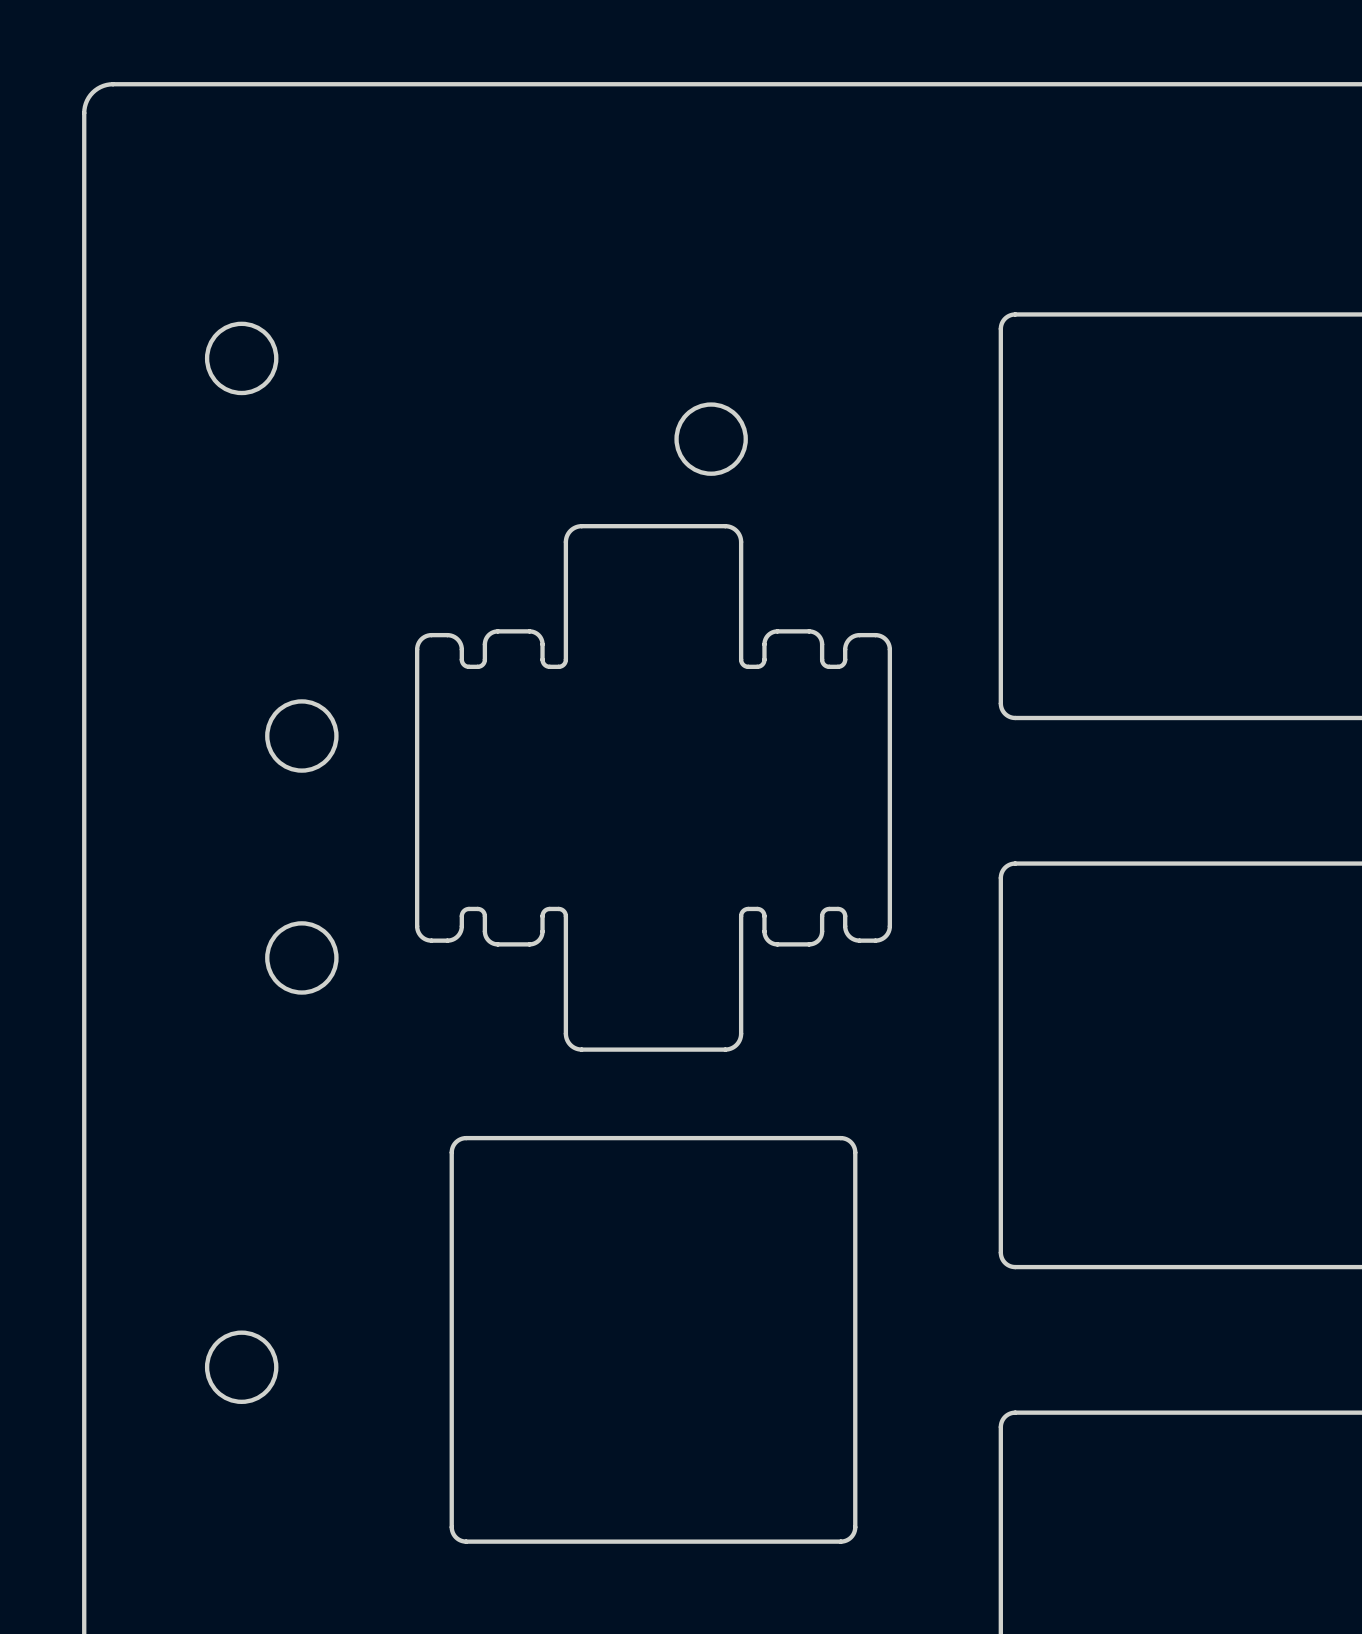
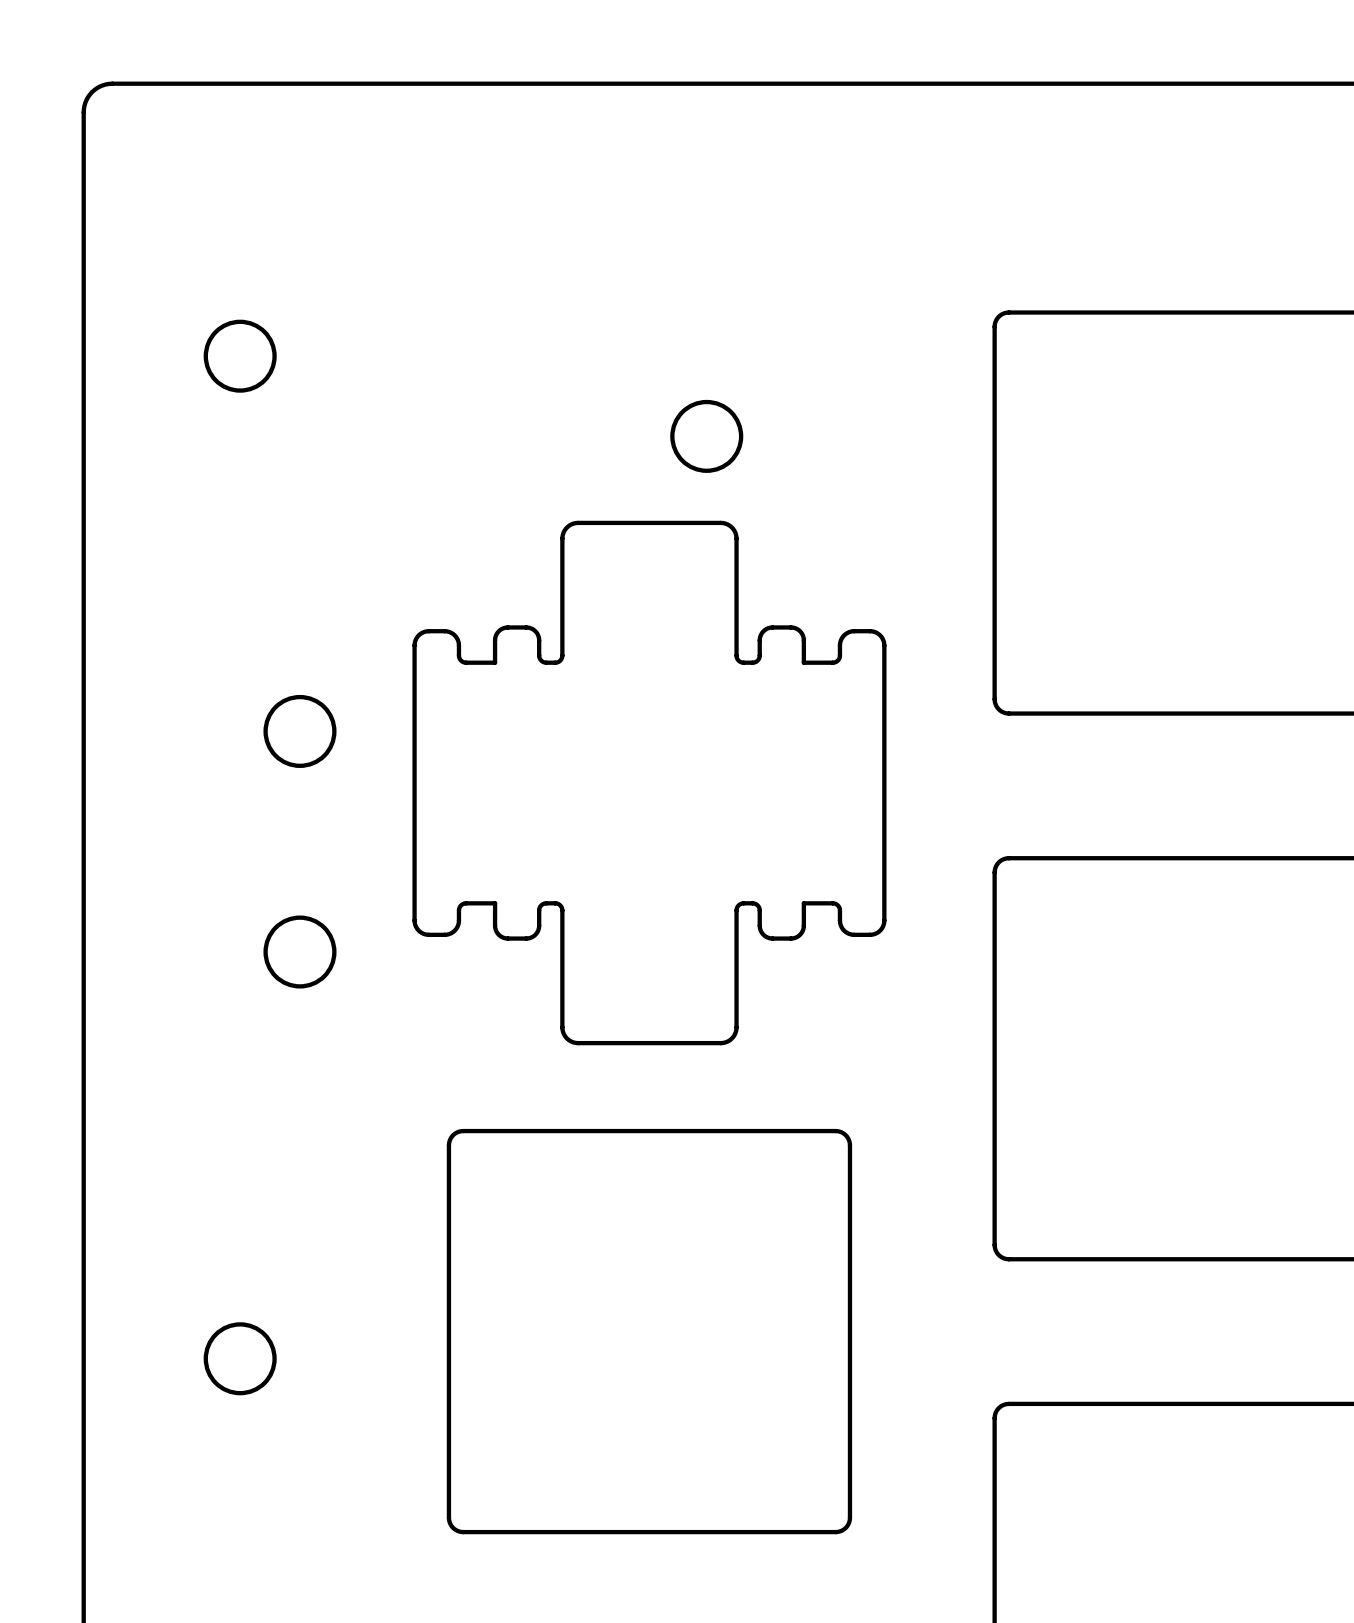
board edge: (511, 631) (496, 631) (488, 635) (484, 642) (484, 662) (477, 666) -> (507, 627) (501, 629) (496, 635) (495, 662) (474, 662)
board edge: (795, 631) (810, 631) (818, 635) (822, 642) (822, 662) (829, 666) -> (790, 627) (798, 630) (802, 635) (803, 662) (824, 662)
board edge: (477, 908) (484, 913) (484, 933) (488, 940) (496, 944) (511, 944) -> (474, 903) (495, 903) (496, 930) (500, 935) (507, 938)
board edge: (829, 908) (822, 913) (822, 933) (818, 940) (810, 944) (795, 944) -> (824, 903) (803, 903) (802, 930) (797, 936) (790, 938)

